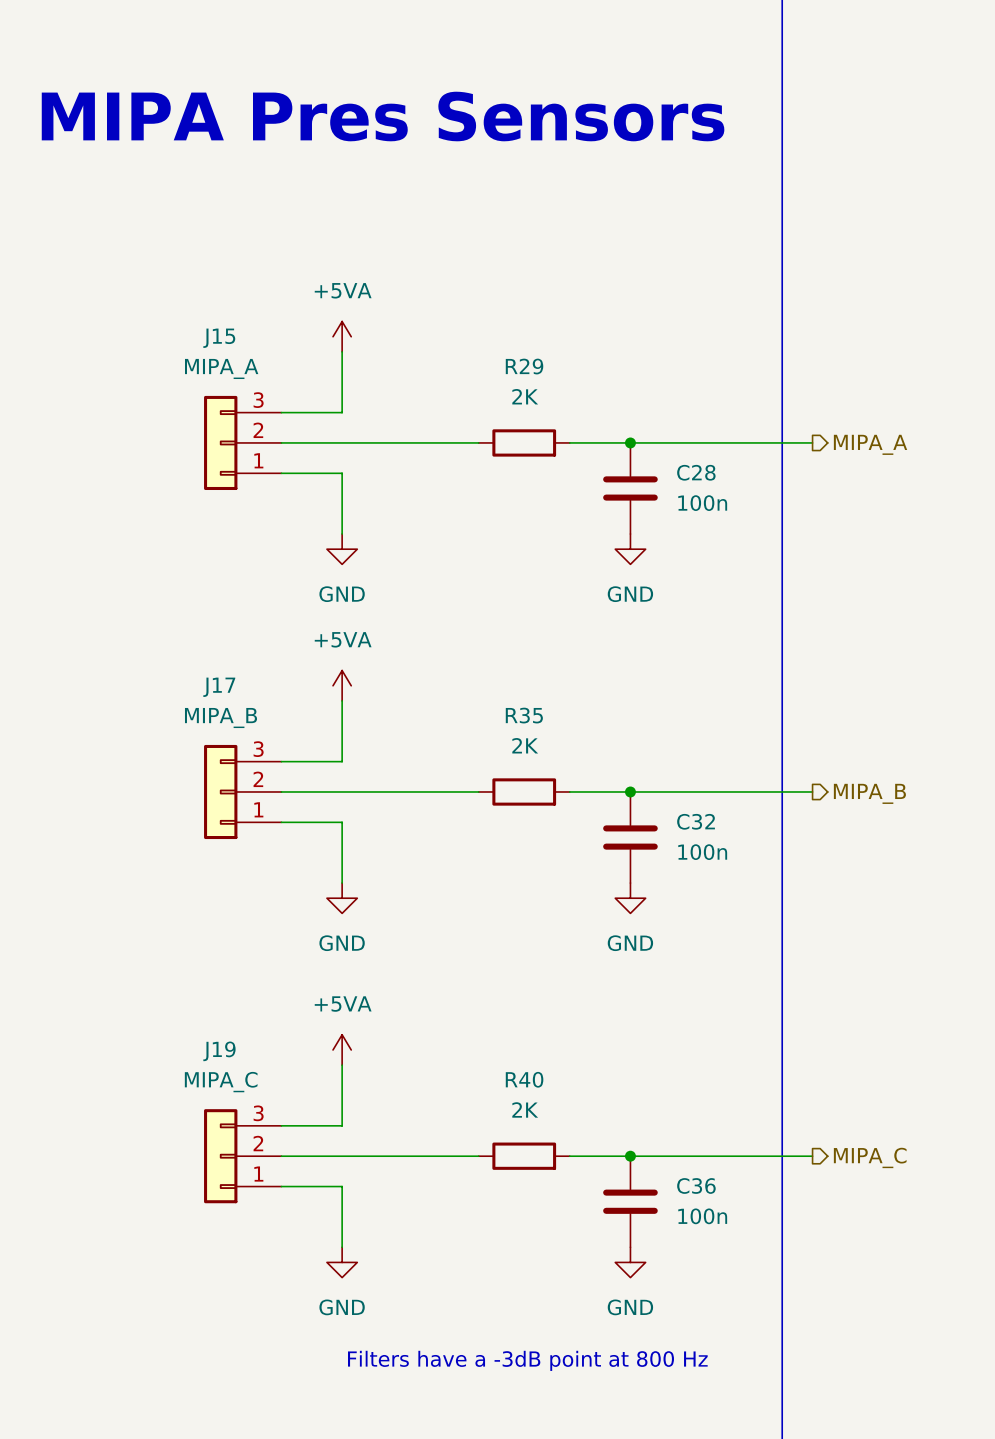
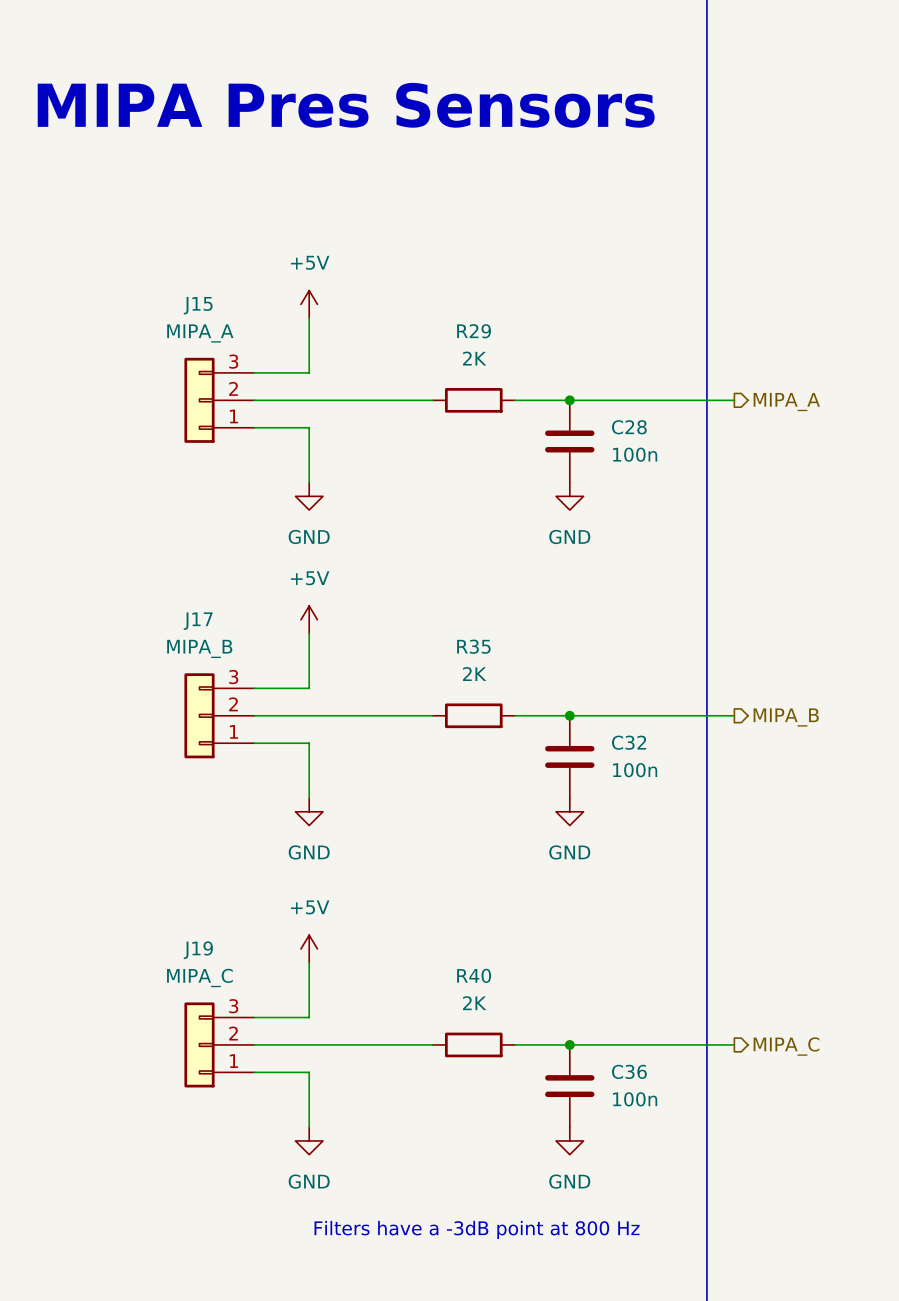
power symbol: +5VA (342, 336) -> +5V (309, 304)
power symbol: +5VA (342, 685) -> +5V (309, 619)
power symbol: +5VA (342, 1049) -> +5V (309, 948)

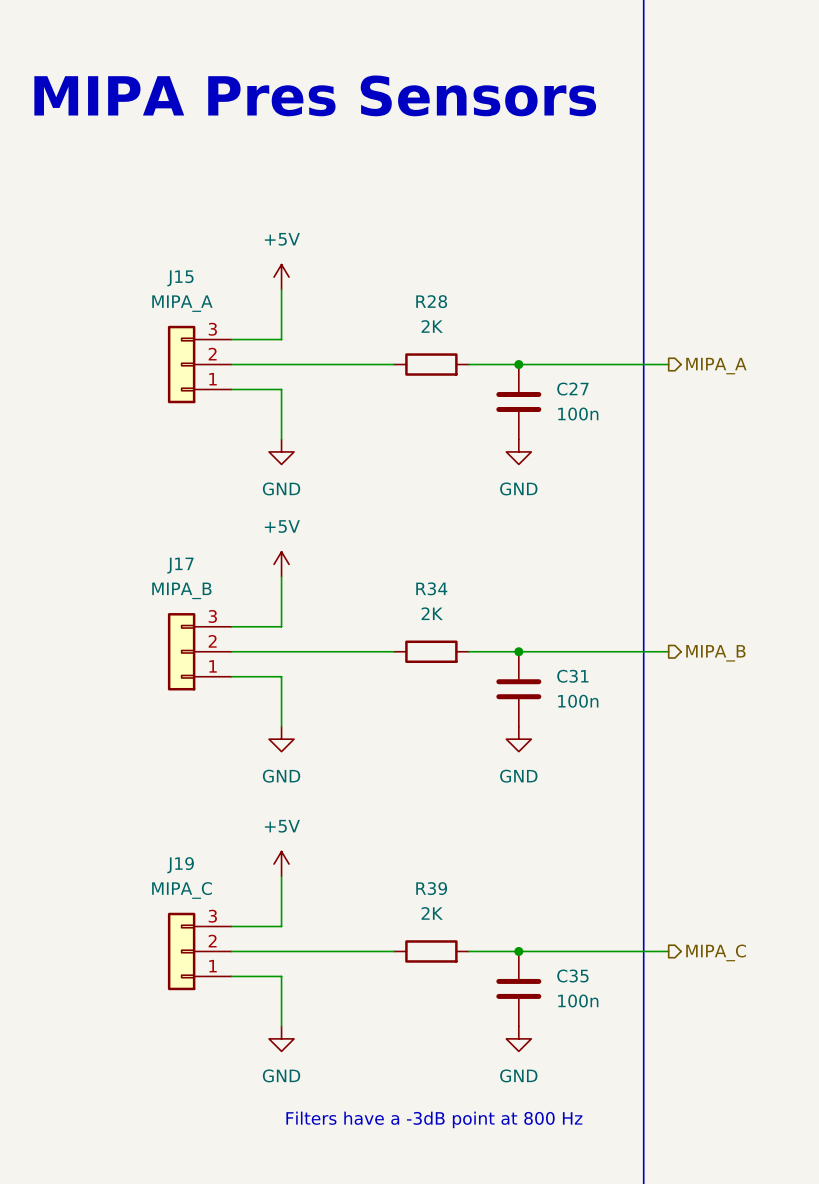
R29 name: R29 (474, 331) -> R28 (431, 301)
C28 name: C28 (629, 427) -> C27 (572, 389)
R35 name: R35 (473, 646) -> R34 (431, 588)
C32 name: C32 (629, 742) -> C31 (572, 676)
R40 name: R40 (474, 975) -> R39 (431, 888)
C36 name: C36 (629, 1071) -> C35 (572, 975)

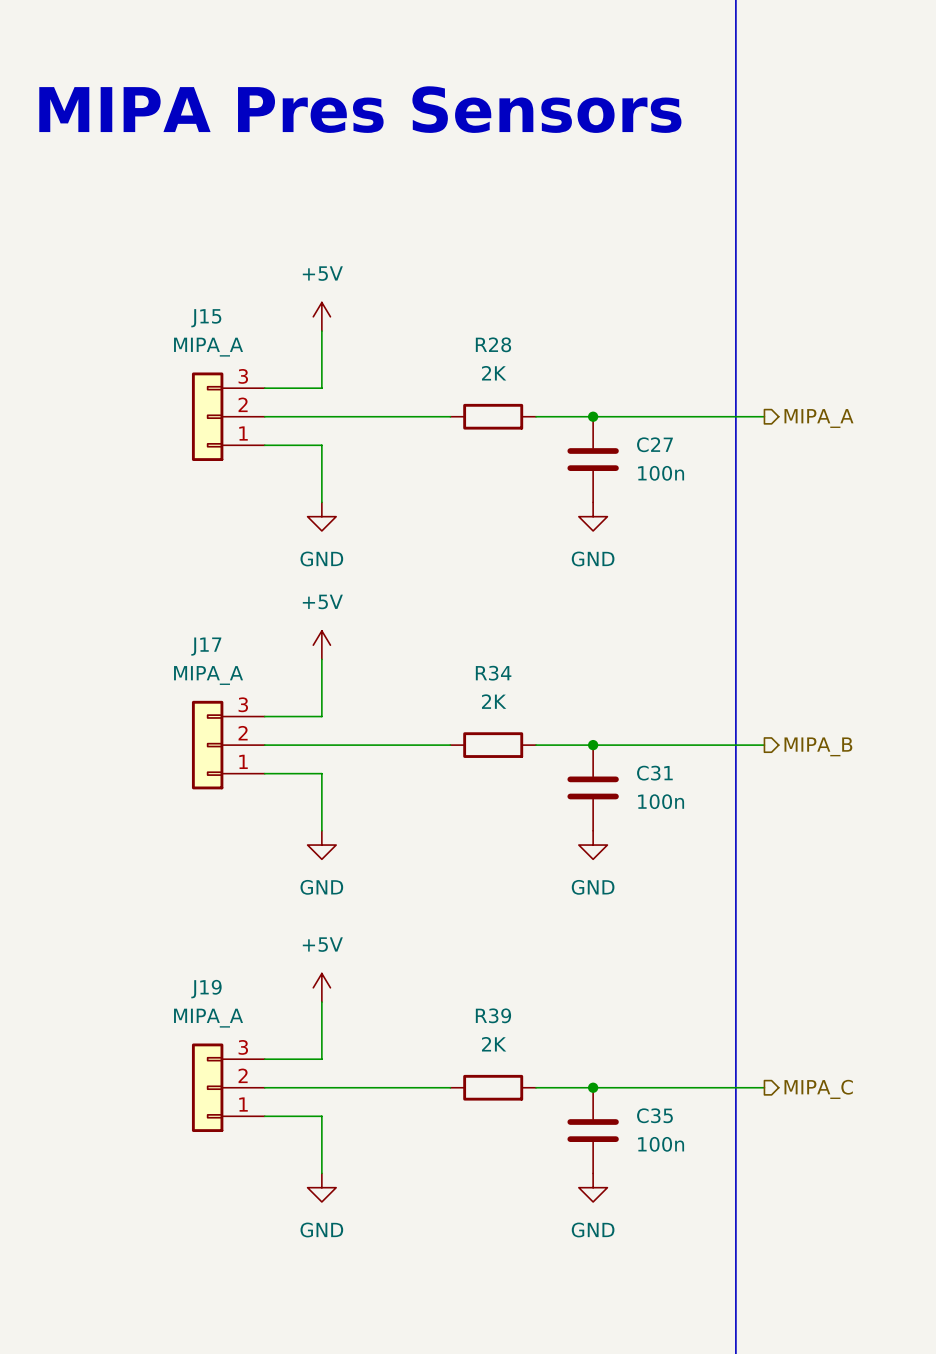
J17 value: MIPA_B (181, 590) -> MIPA_A (208, 675)
J19 value: MIPA_C (182, 890) -> MIPA_A (208, 1018)
text: Filters have a -3dB point at 800 Hz (434, 1119) -> none

